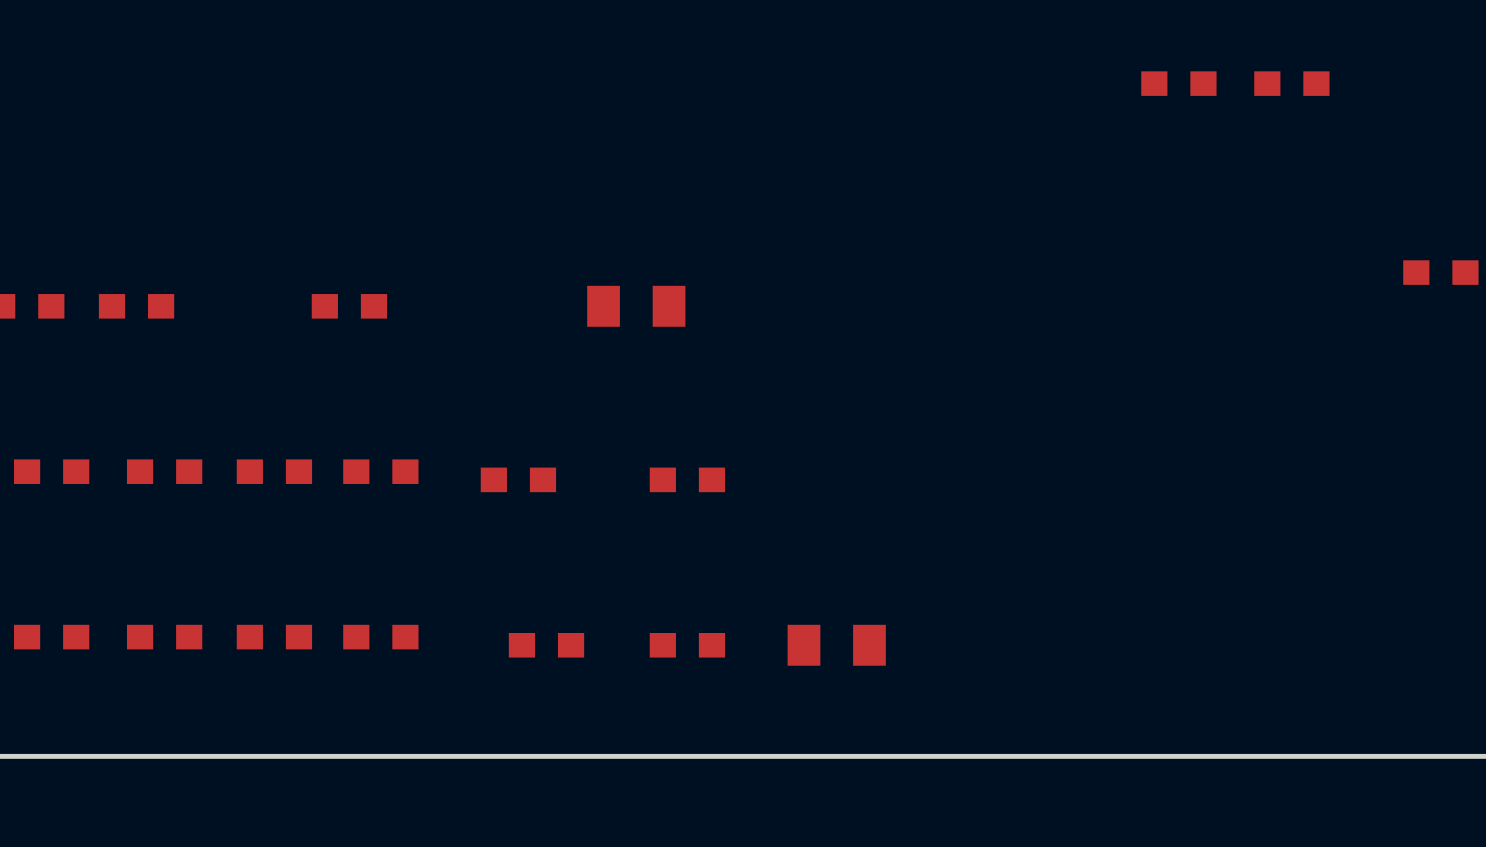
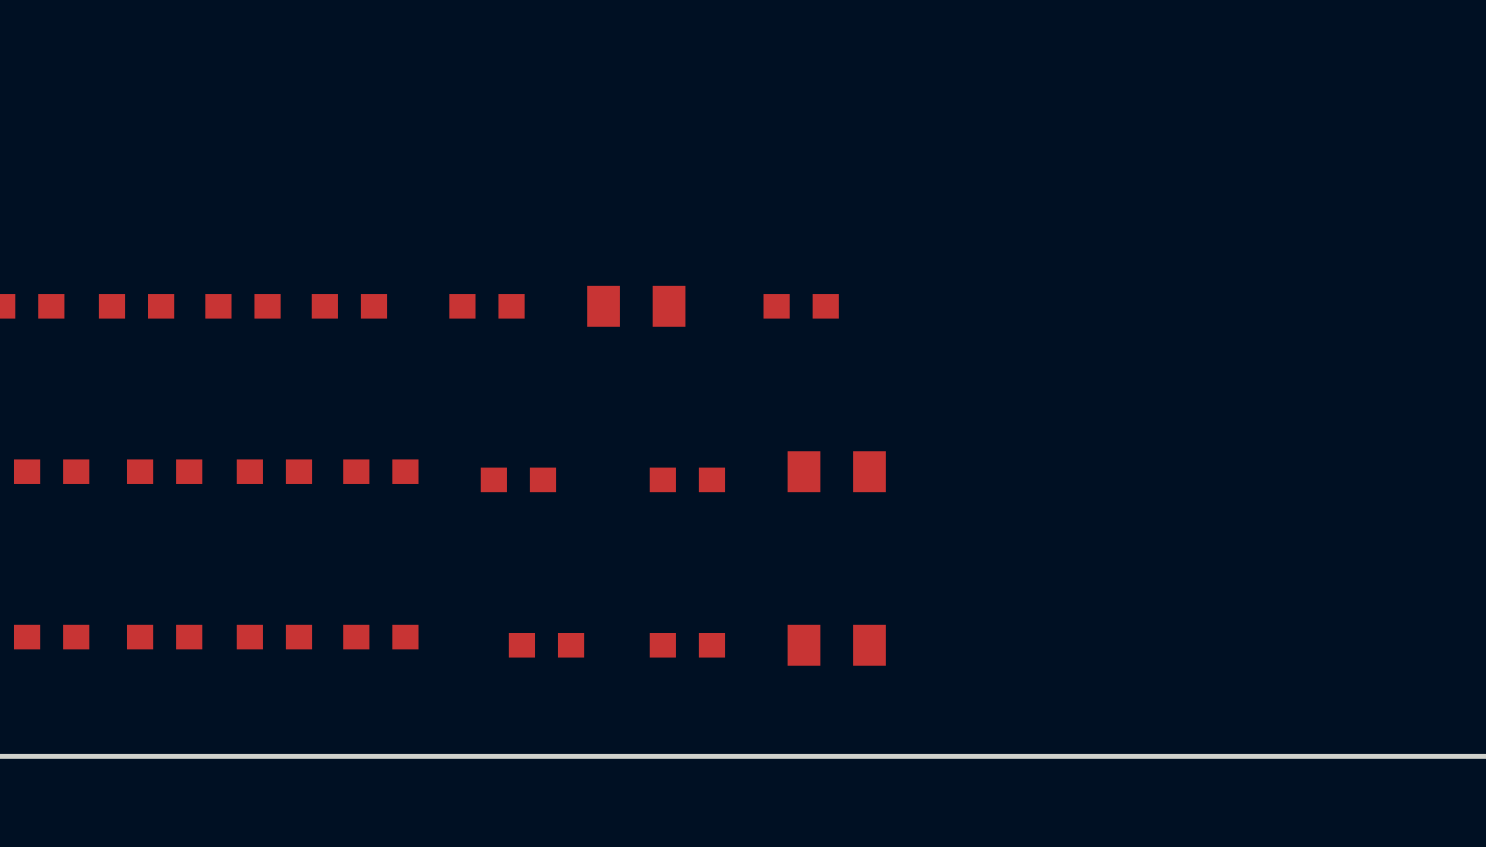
part: (1178, 83) -> none
part: (1291, 83) -> none
part: (1440, 272) -> none
part: none -> (242, 306)
part: none -> (486, 306)
part: none -> (801, 306)
part: none -> (836, 471)

